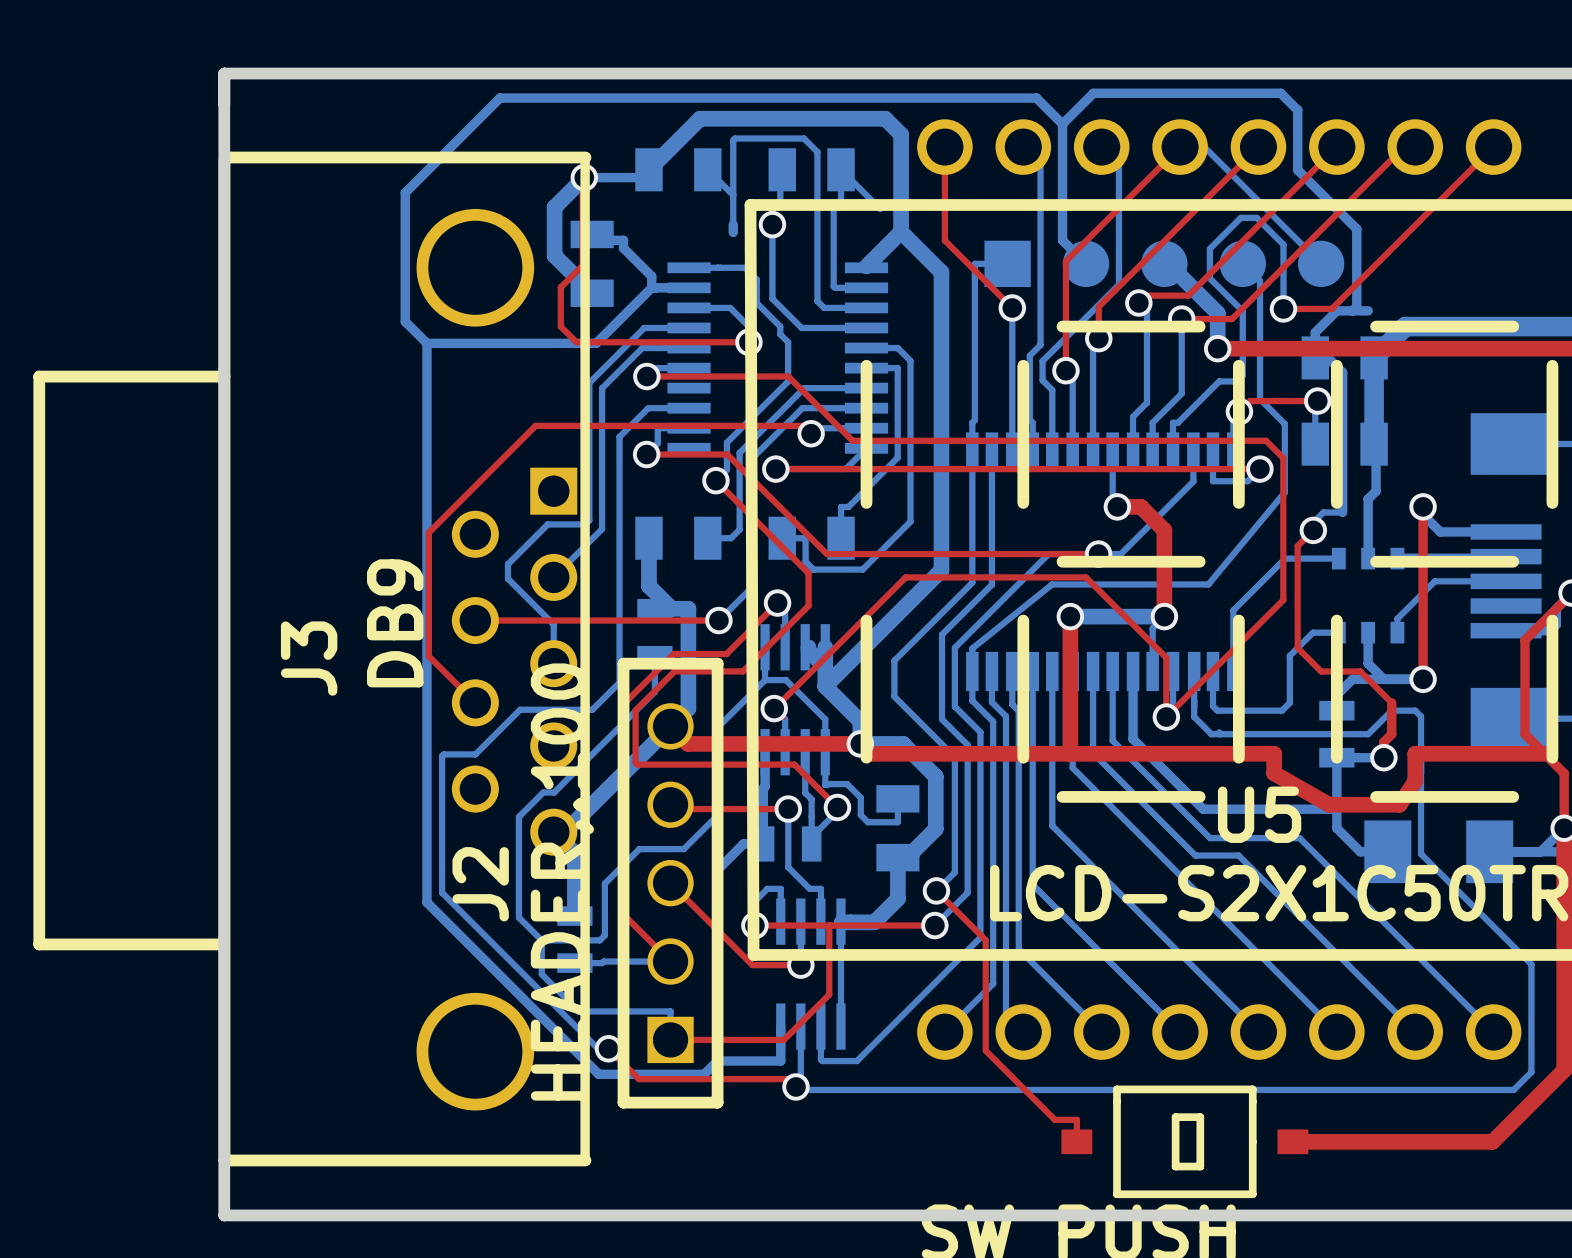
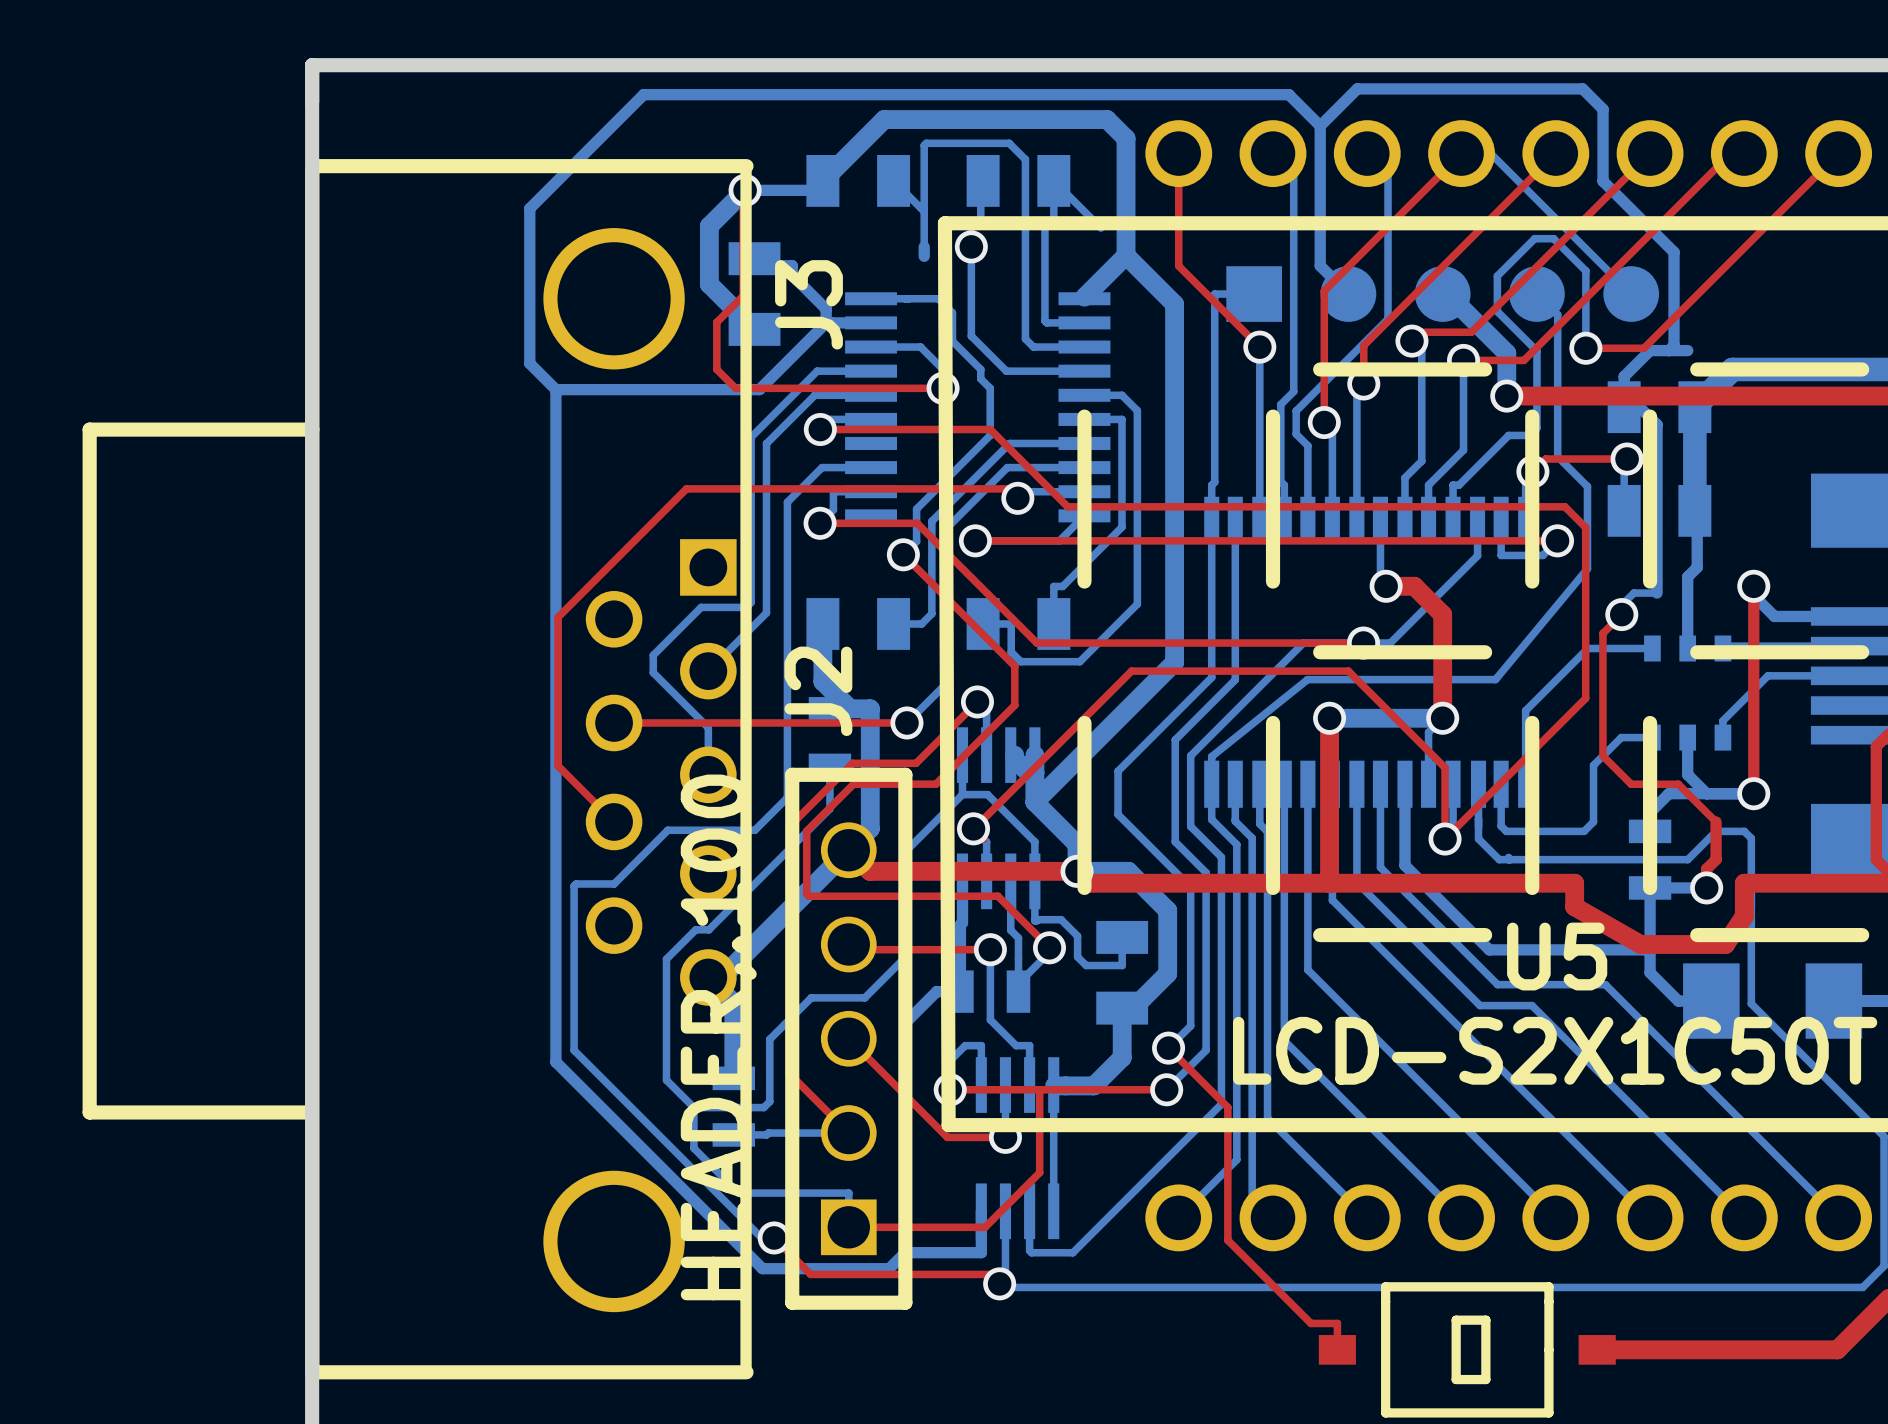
J3 value: DB9 (395, 623) -> none
J3 name position: J3 (309, 658) -> J3 (808, 304)
J2 name position: J2 (480, 884) -> J2 (818, 691)

